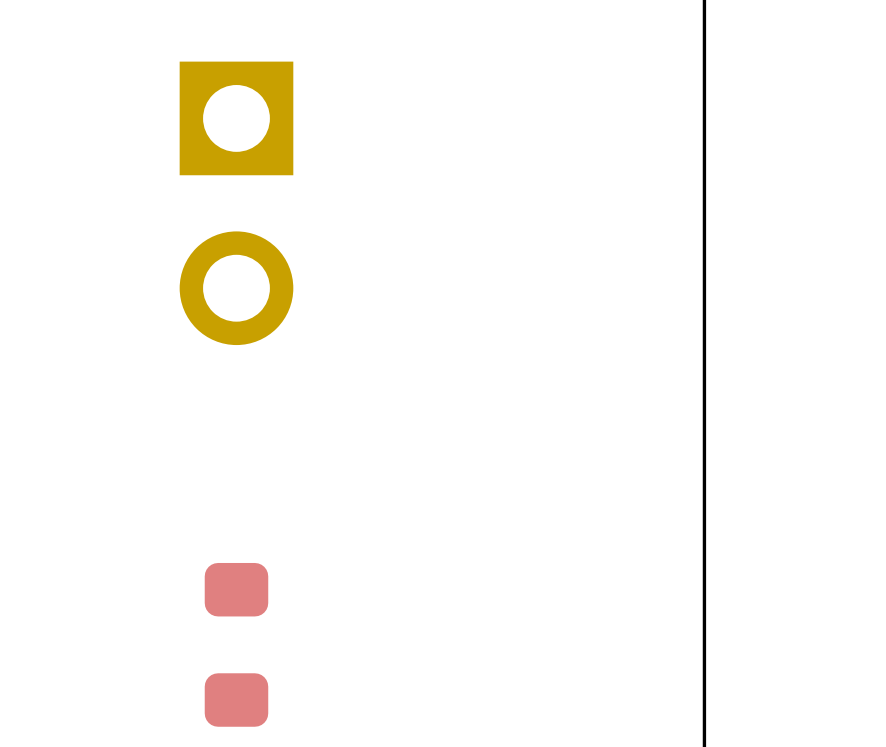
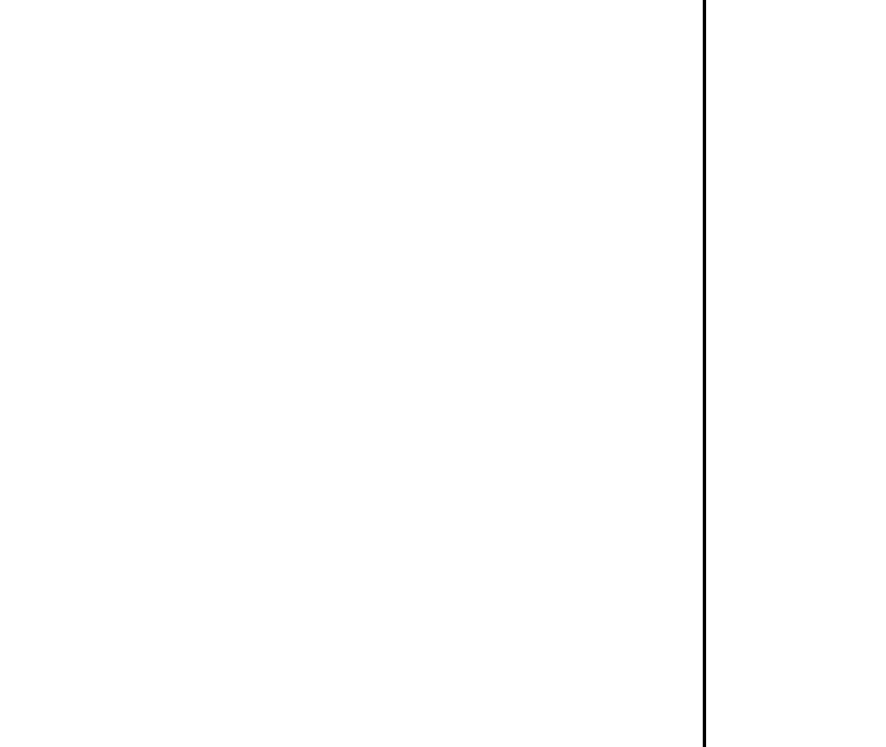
part: (236, 203) -> none
part: (236, 644) -> none

